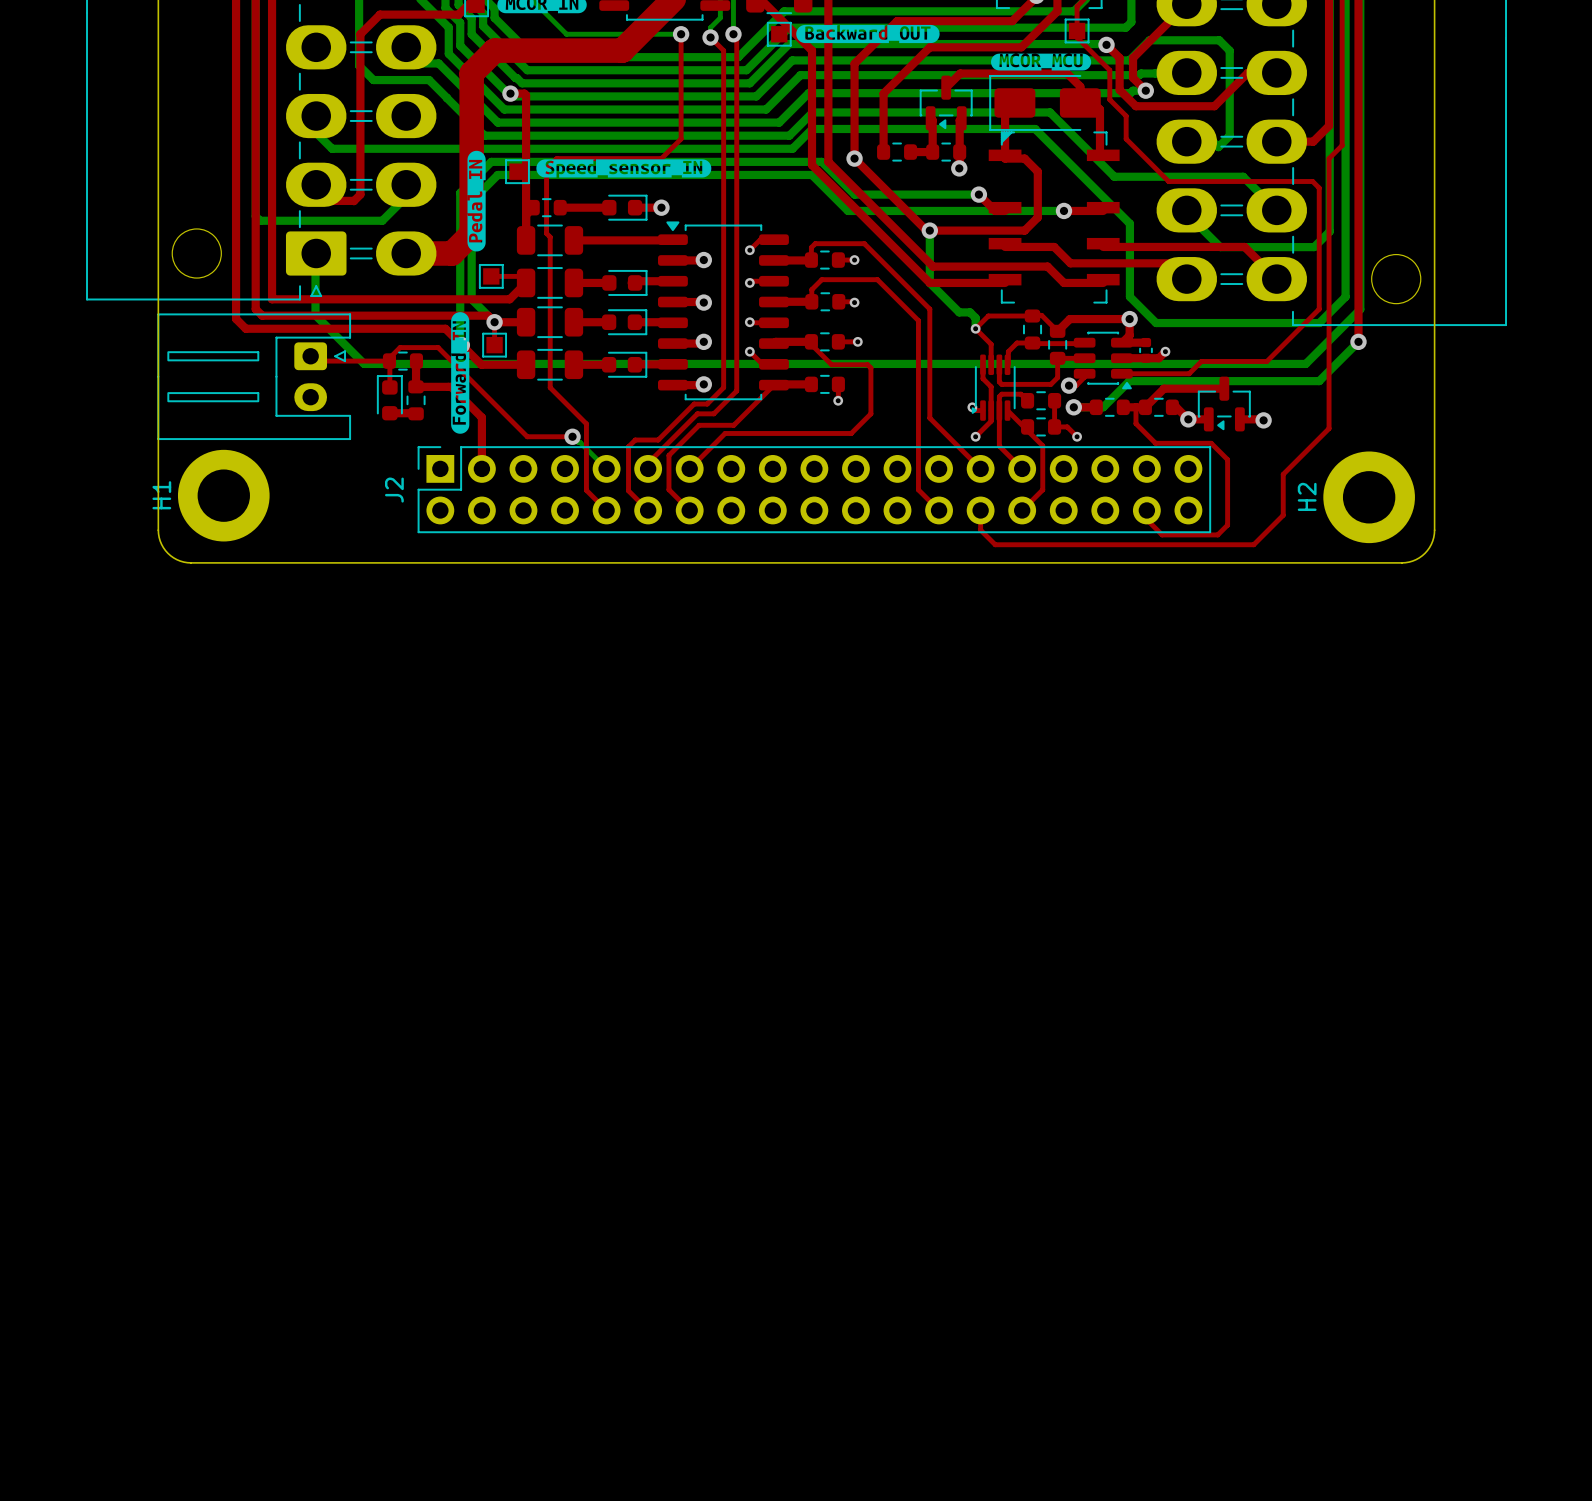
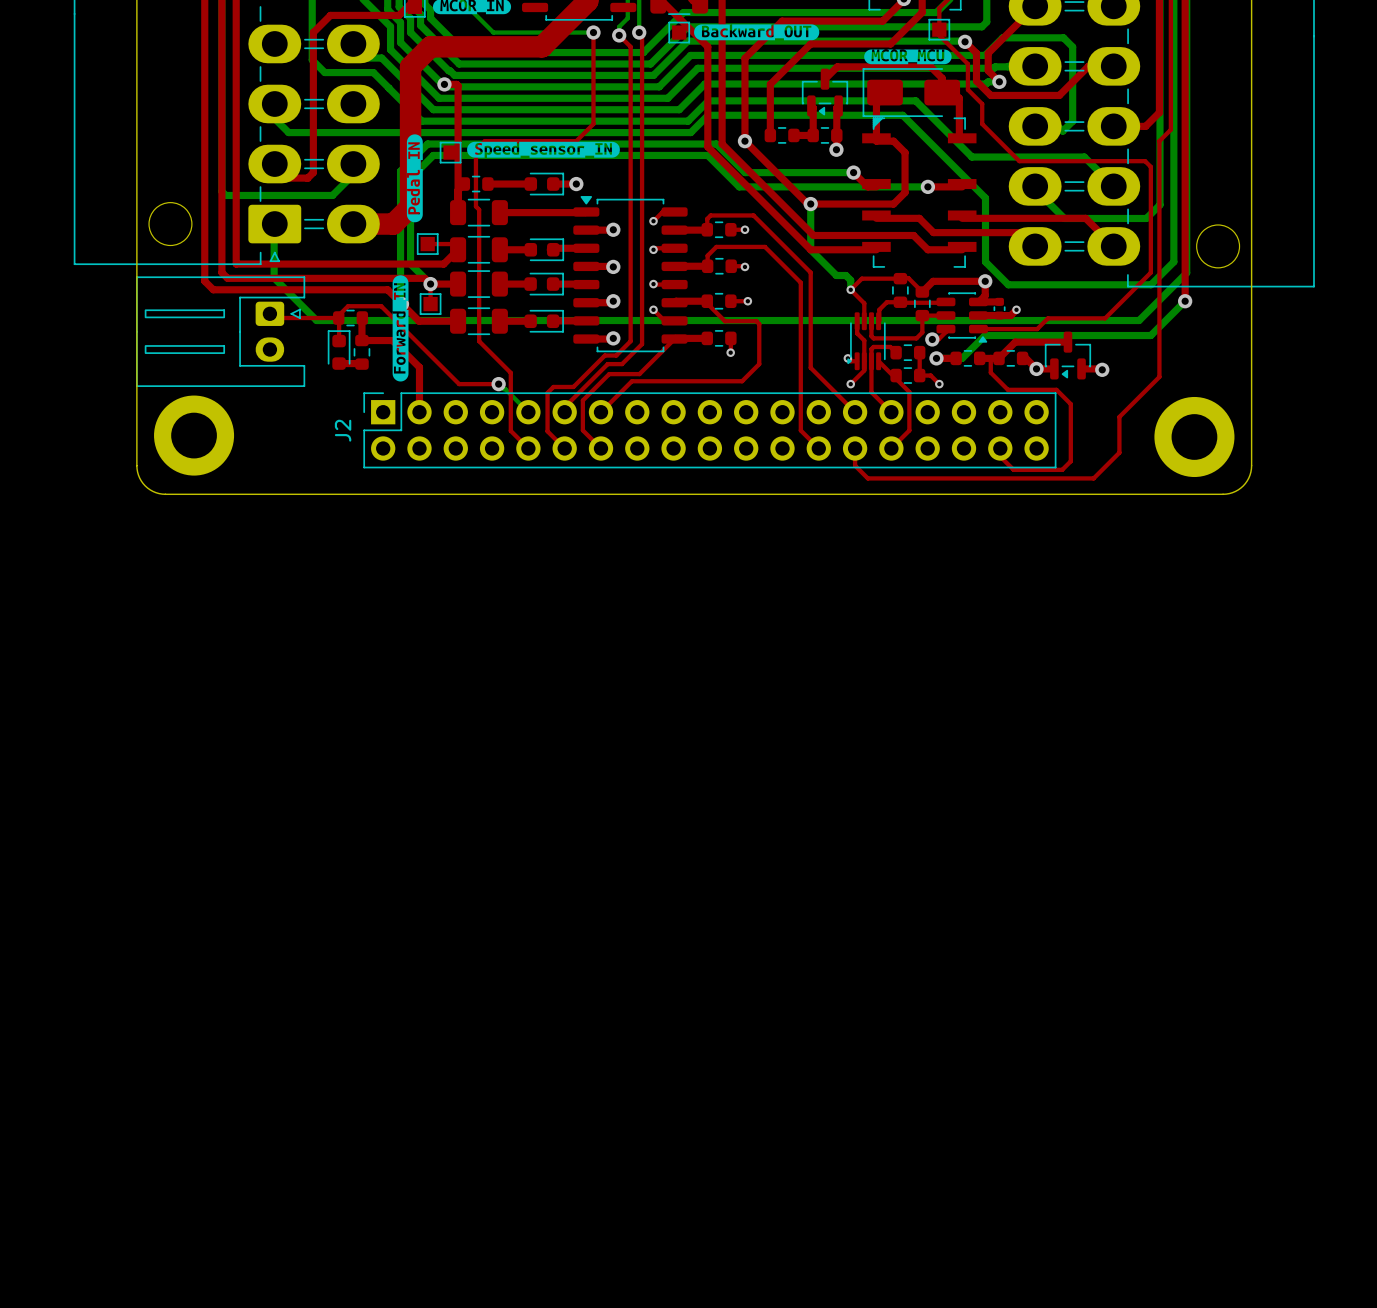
H1 name: H1 (161, 495) -> none
H2 name: H2 (1307, 496) -> none

